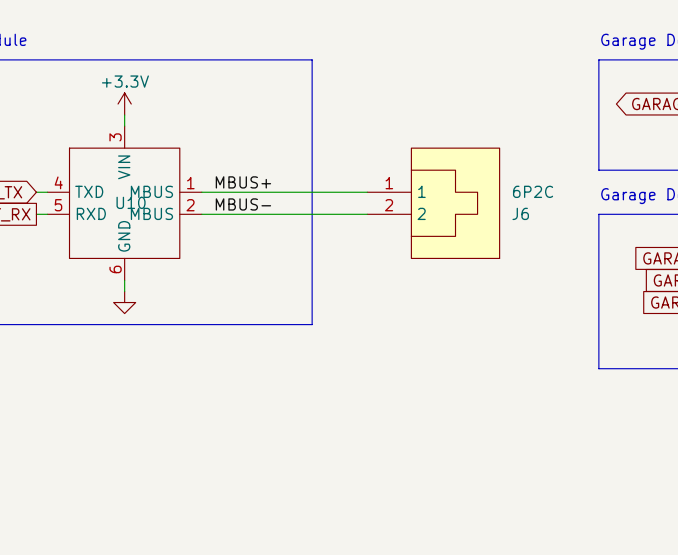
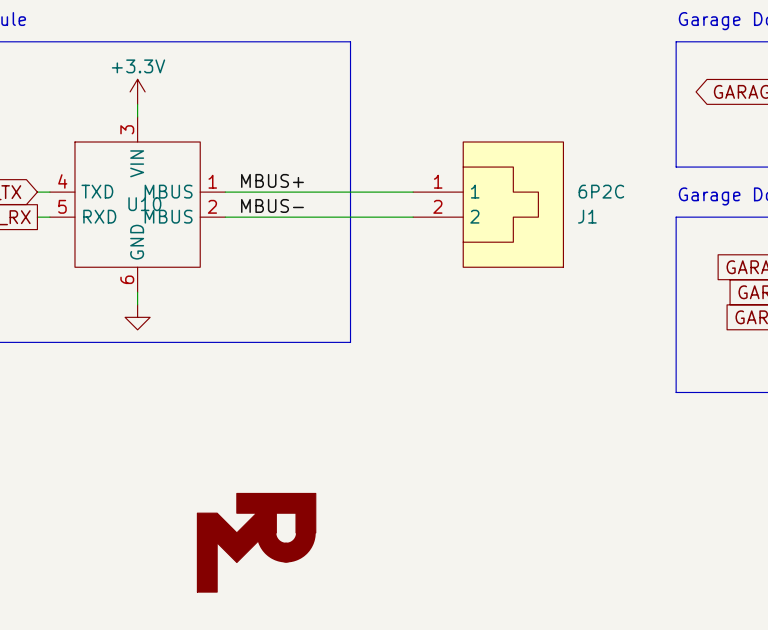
J6 name: J6 (520, 213) -> J1 (587, 216)
power symbol: none -> (256, 542)

